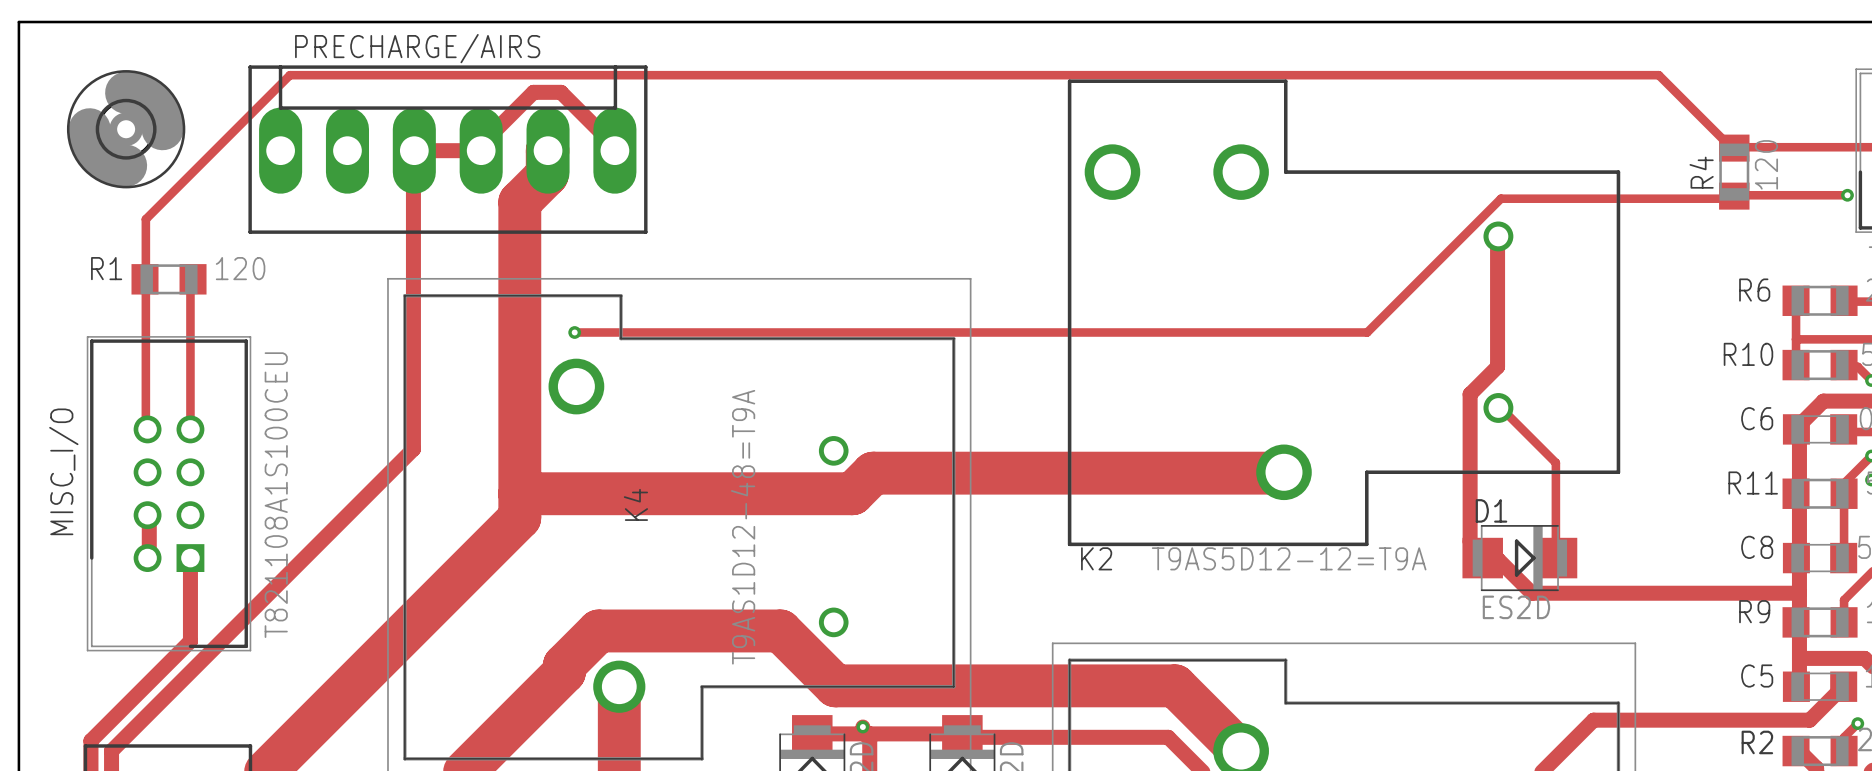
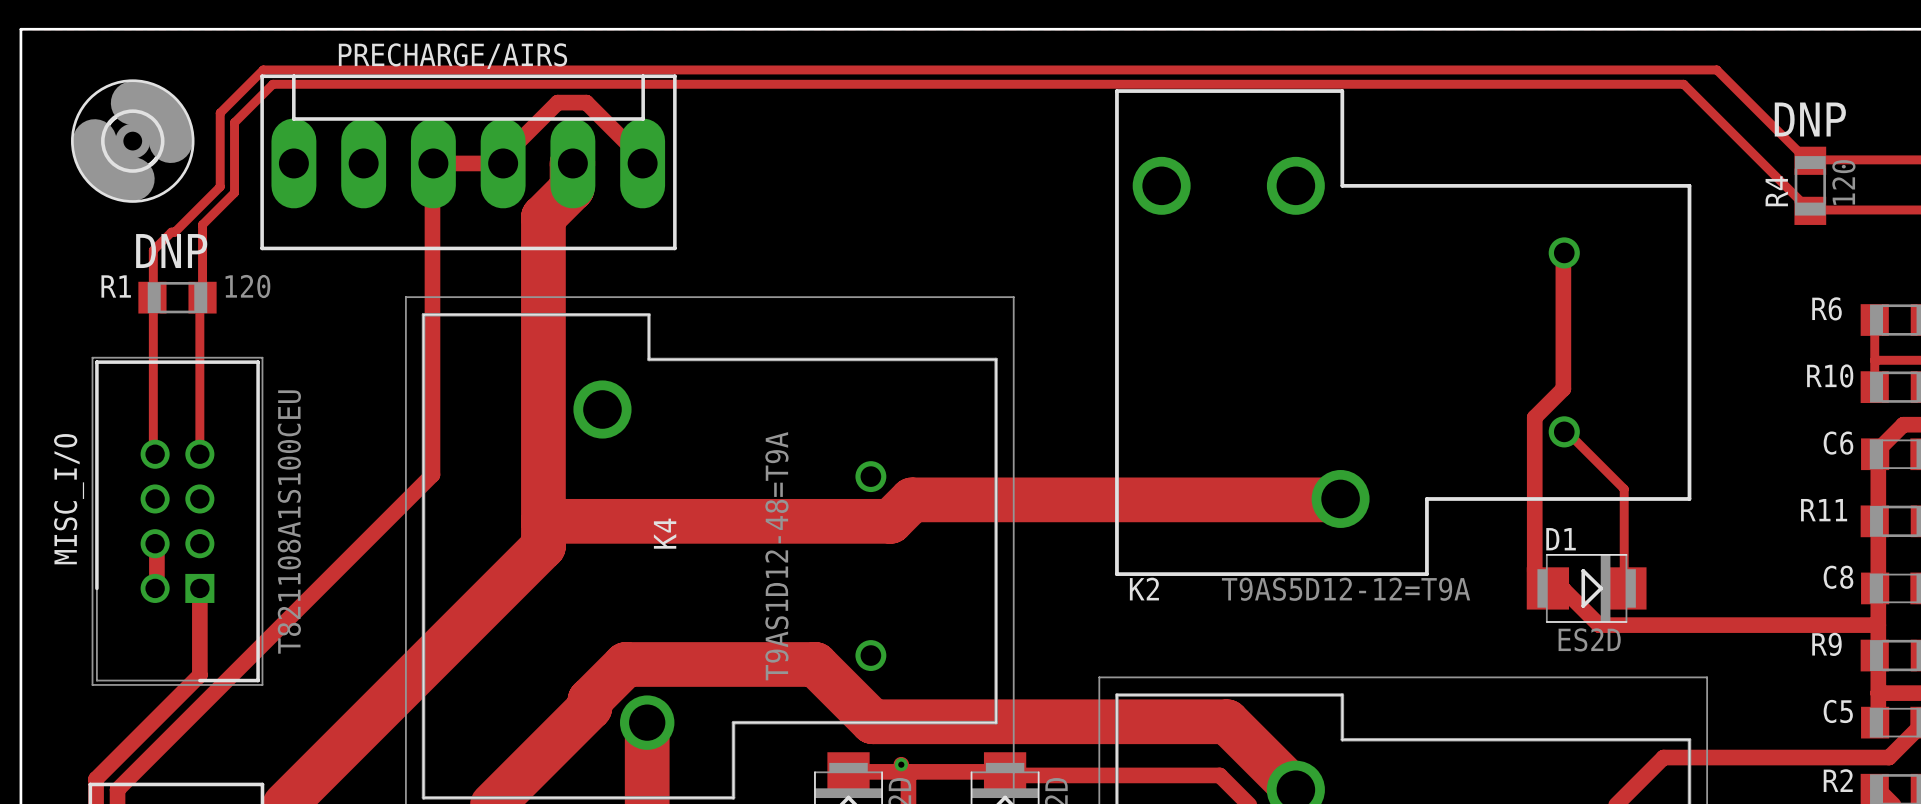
track: (1658, 75) (289, 75) (145, 219) (145, 233) -> (1731, 84) (1716, 69) (263, 69) (220, 113) (220, 186) (174, 232) (171, 232) (153, 250)
text: none -> DNP (1810, 119)
track: (1734, 196) (1730, 198) (1500, 198) (1367, 332) (574, 332) -> (1810, 210) (1683, 84) (272, 84) (234, 122) (234, 192) (202, 224) (202, 297)
text: none -> DNP (171, 251)
via: (574, 332) -> none

